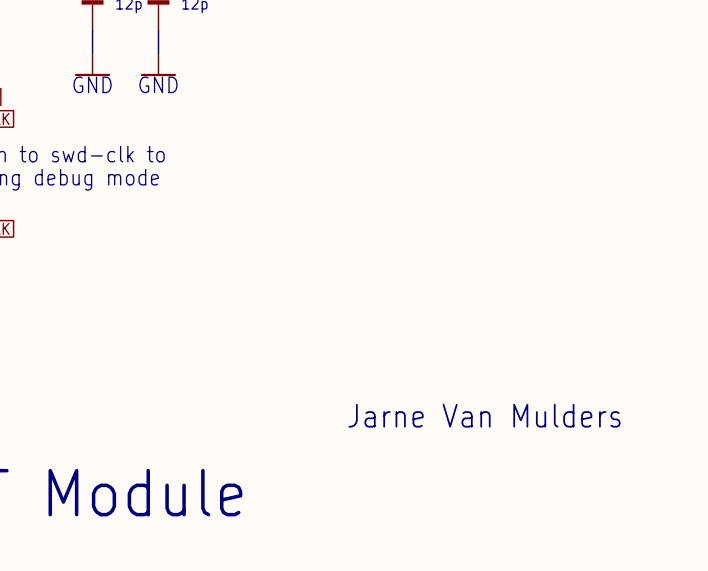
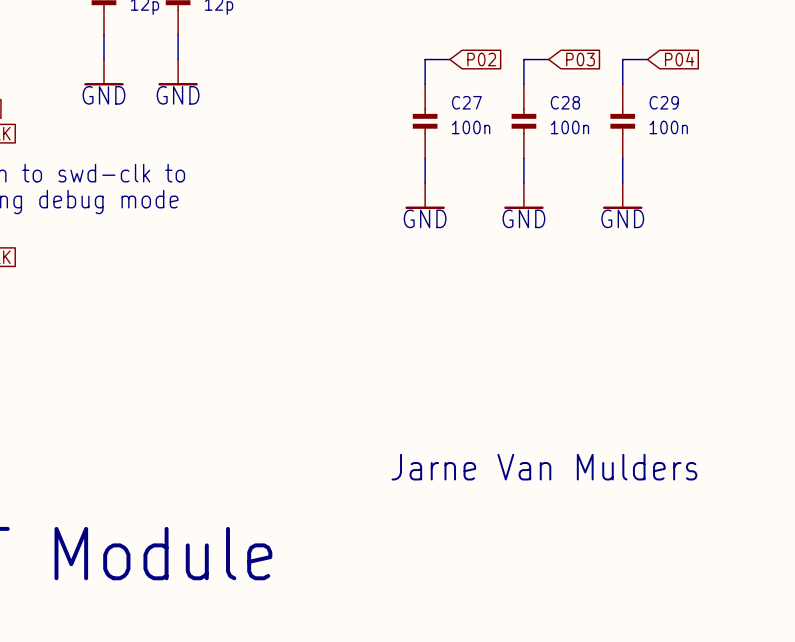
wire: none -> (449, 59) (425, 59) (425, 84)
global label: none -> P02 (481, 59)
wire: none -> (548, 59) (523, 59) (523, 84)
global label: none -> P03 (580, 59)
wire: none -> (647, 59) (622, 59) (622, 84)
global label: none -> P04 (679, 59)
C27: none -> 100n (425, 121)
C28: none -> 100n (523, 121)
C29: none -> 100n (622, 121)
wire: none -> (425, 158) (425, 183)
wire: none -> (523, 158) (523, 183)
wire: none -> (622, 158) (622, 183)
power symbol: none -> GND (425, 196)
power symbol: none -> GND (523, 196)
power symbol: none -> GND (622, 196)

